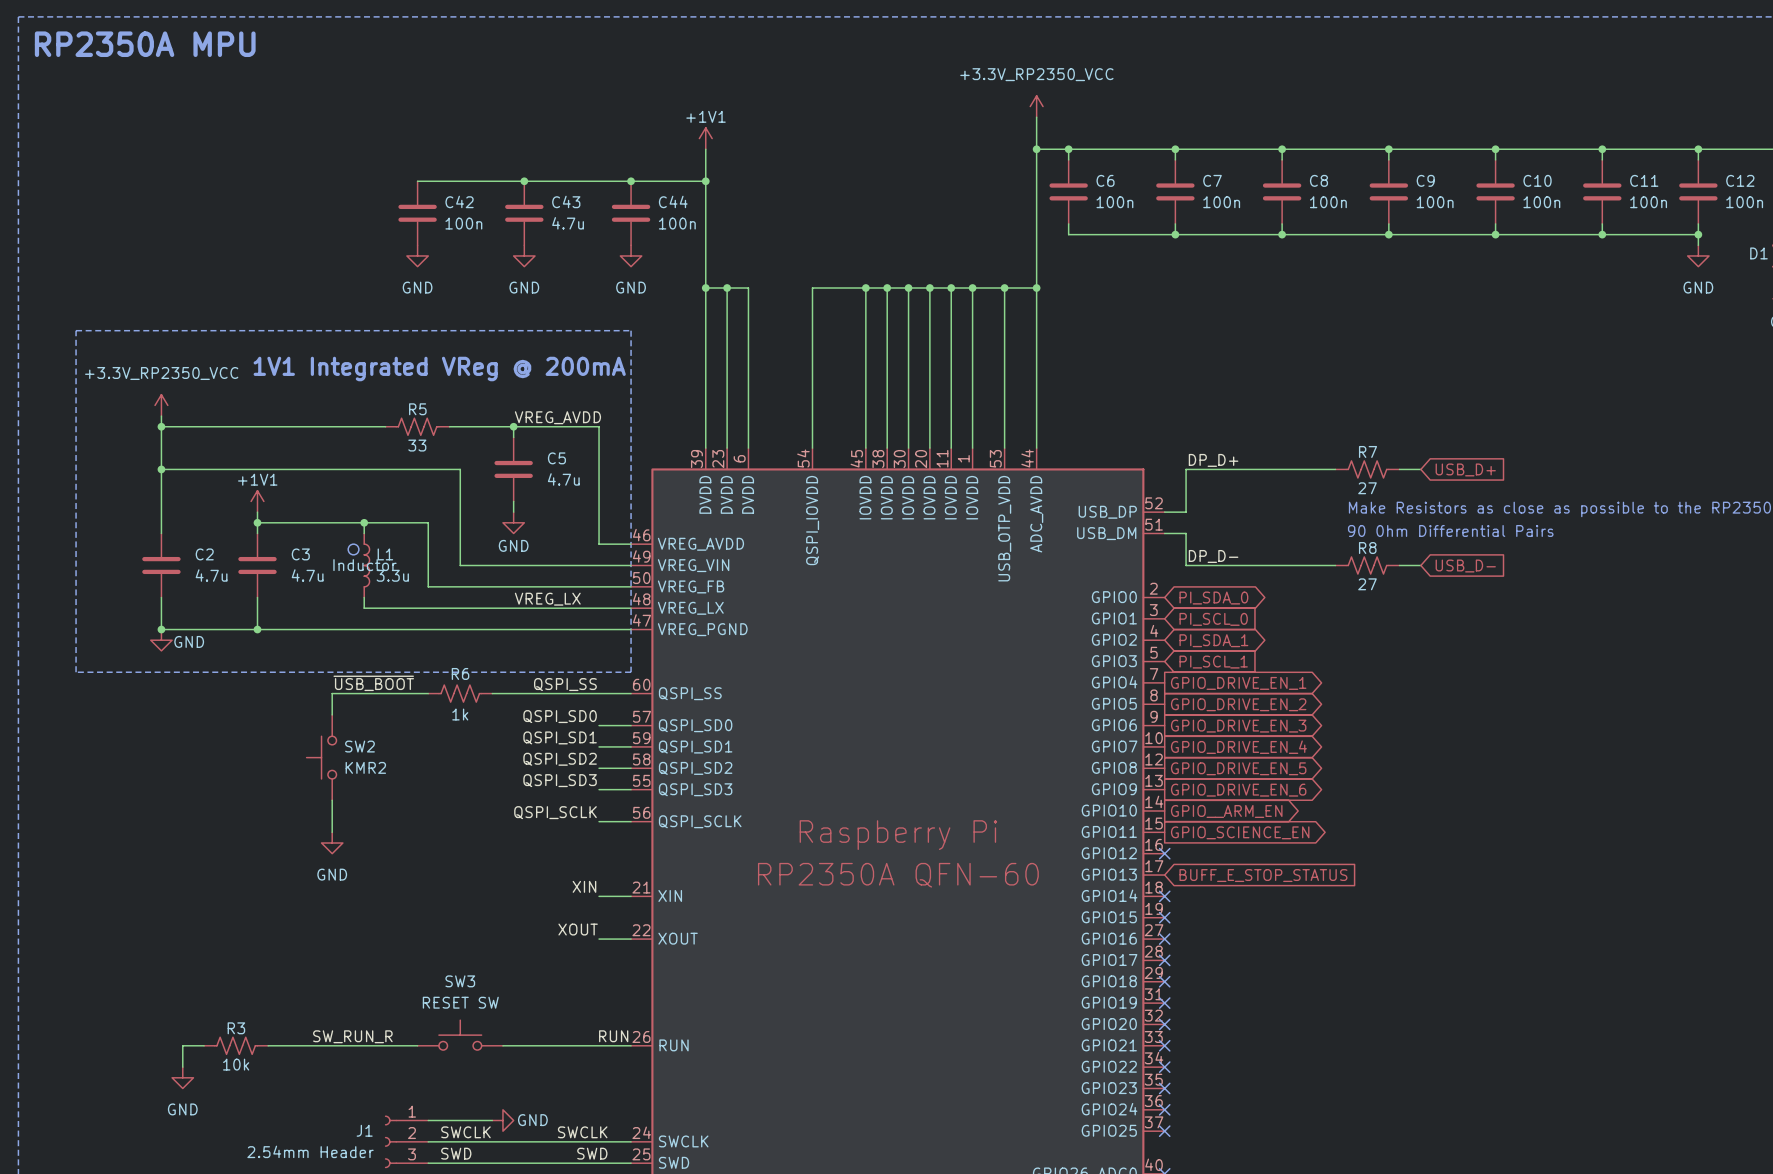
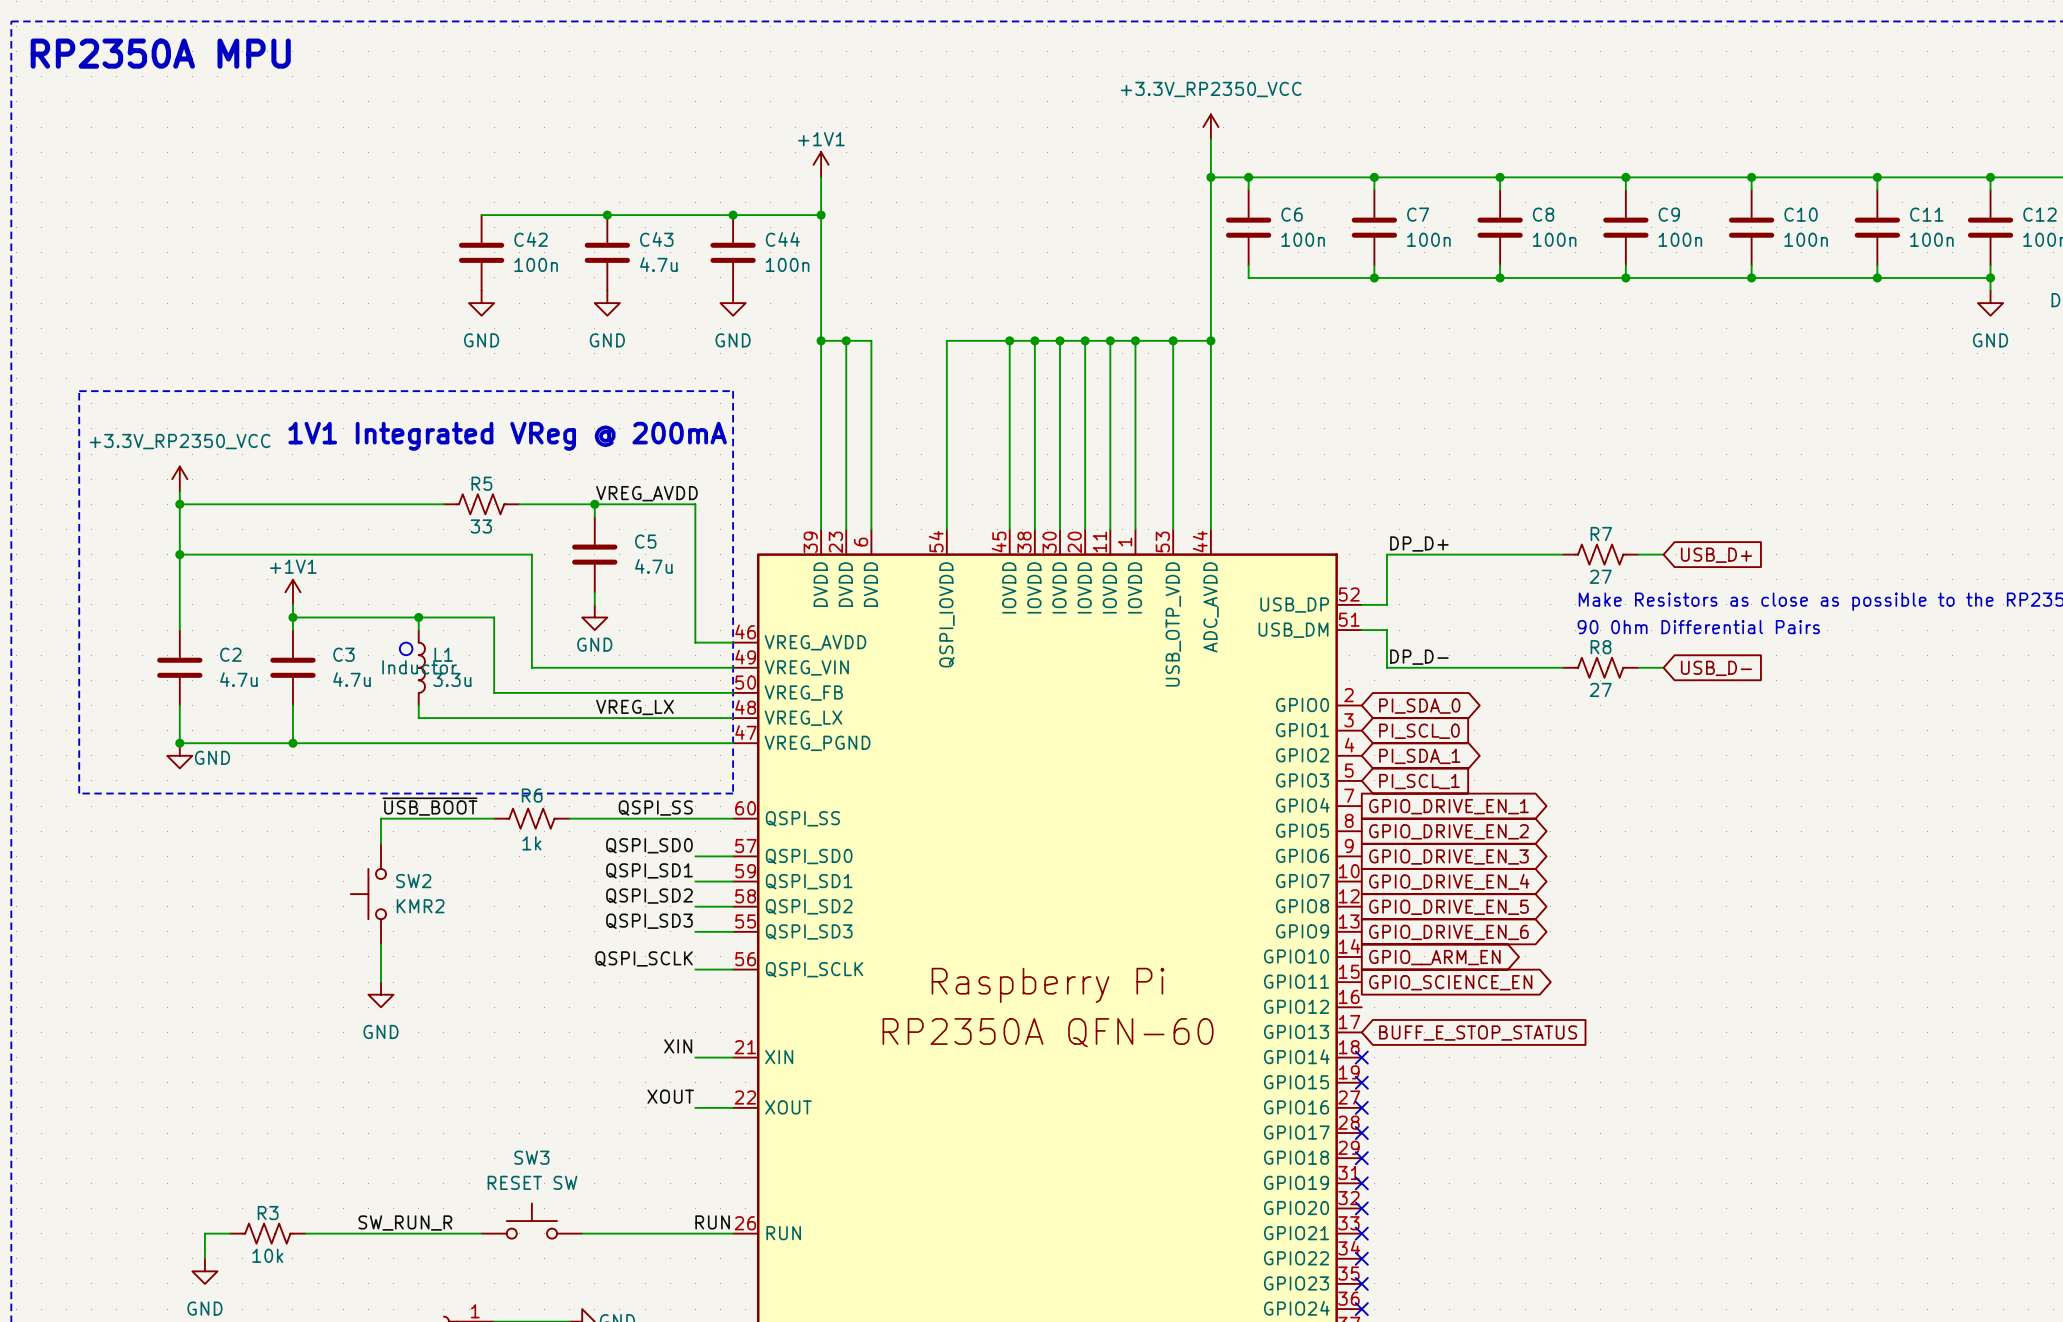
no-connect mark: (1164, 853) -> none

